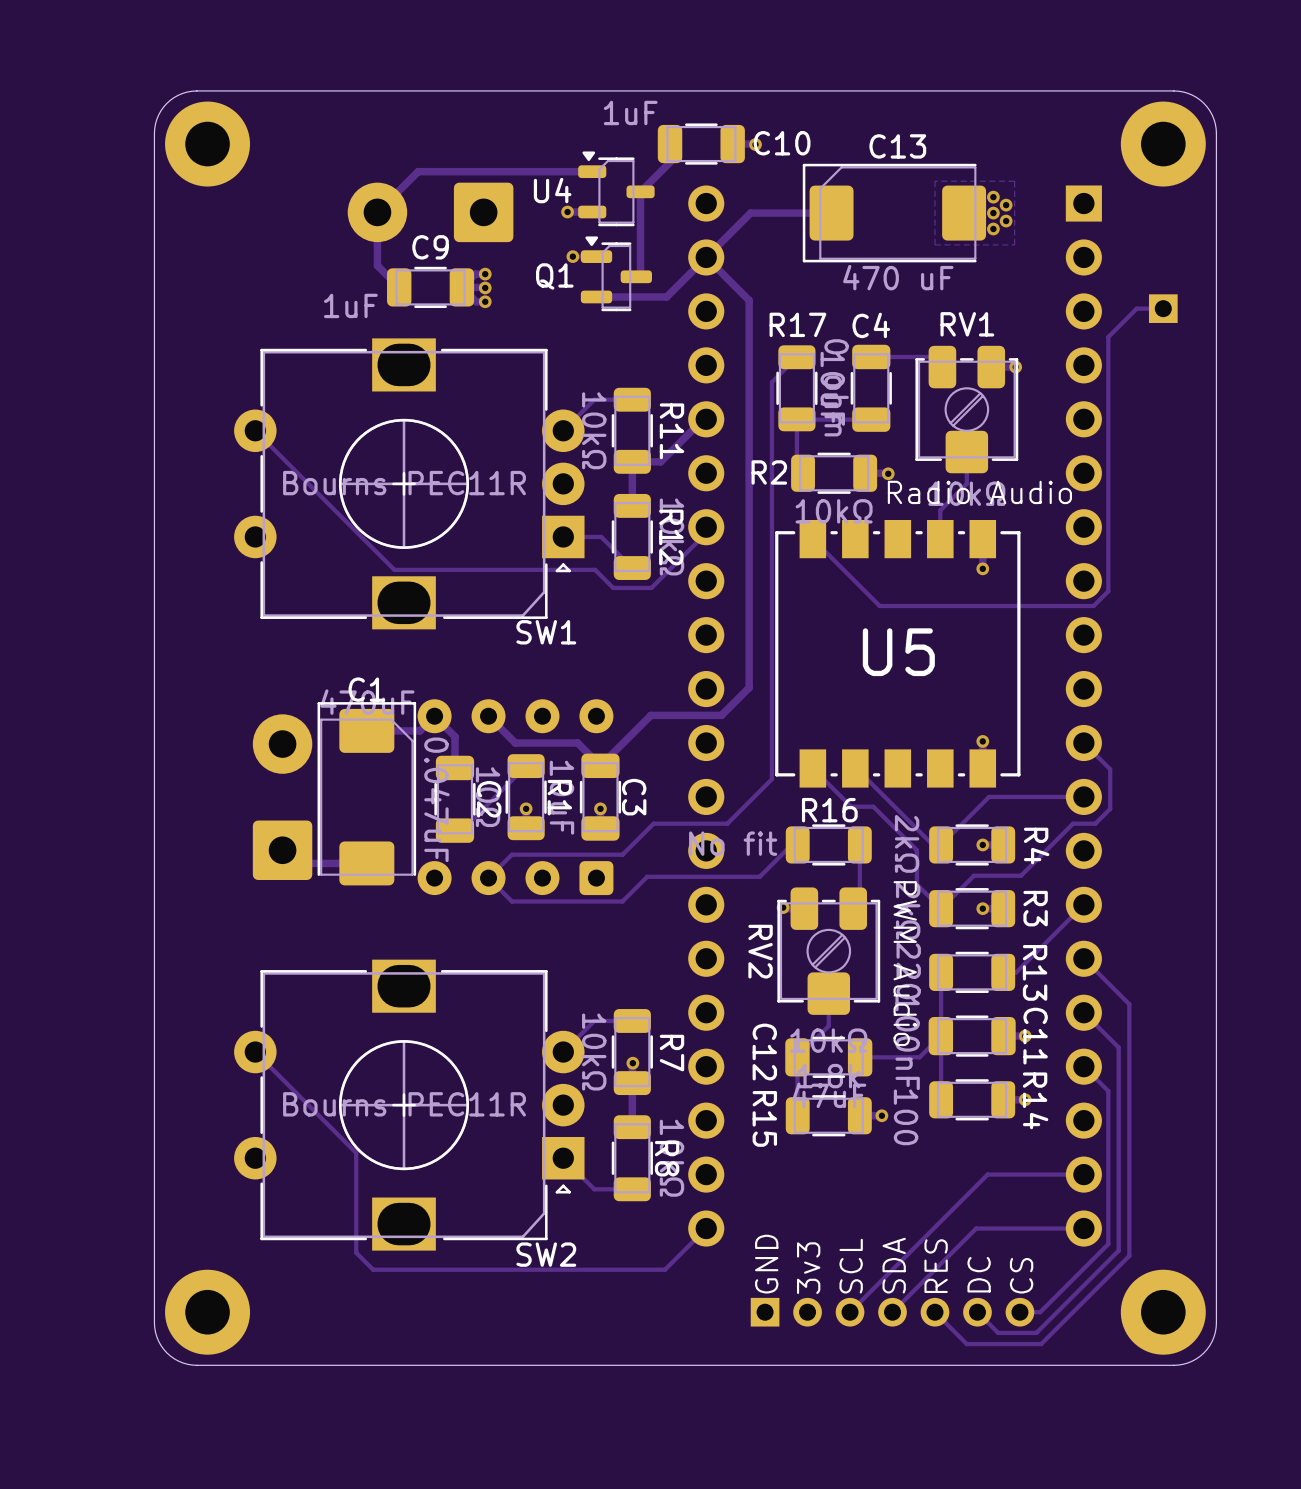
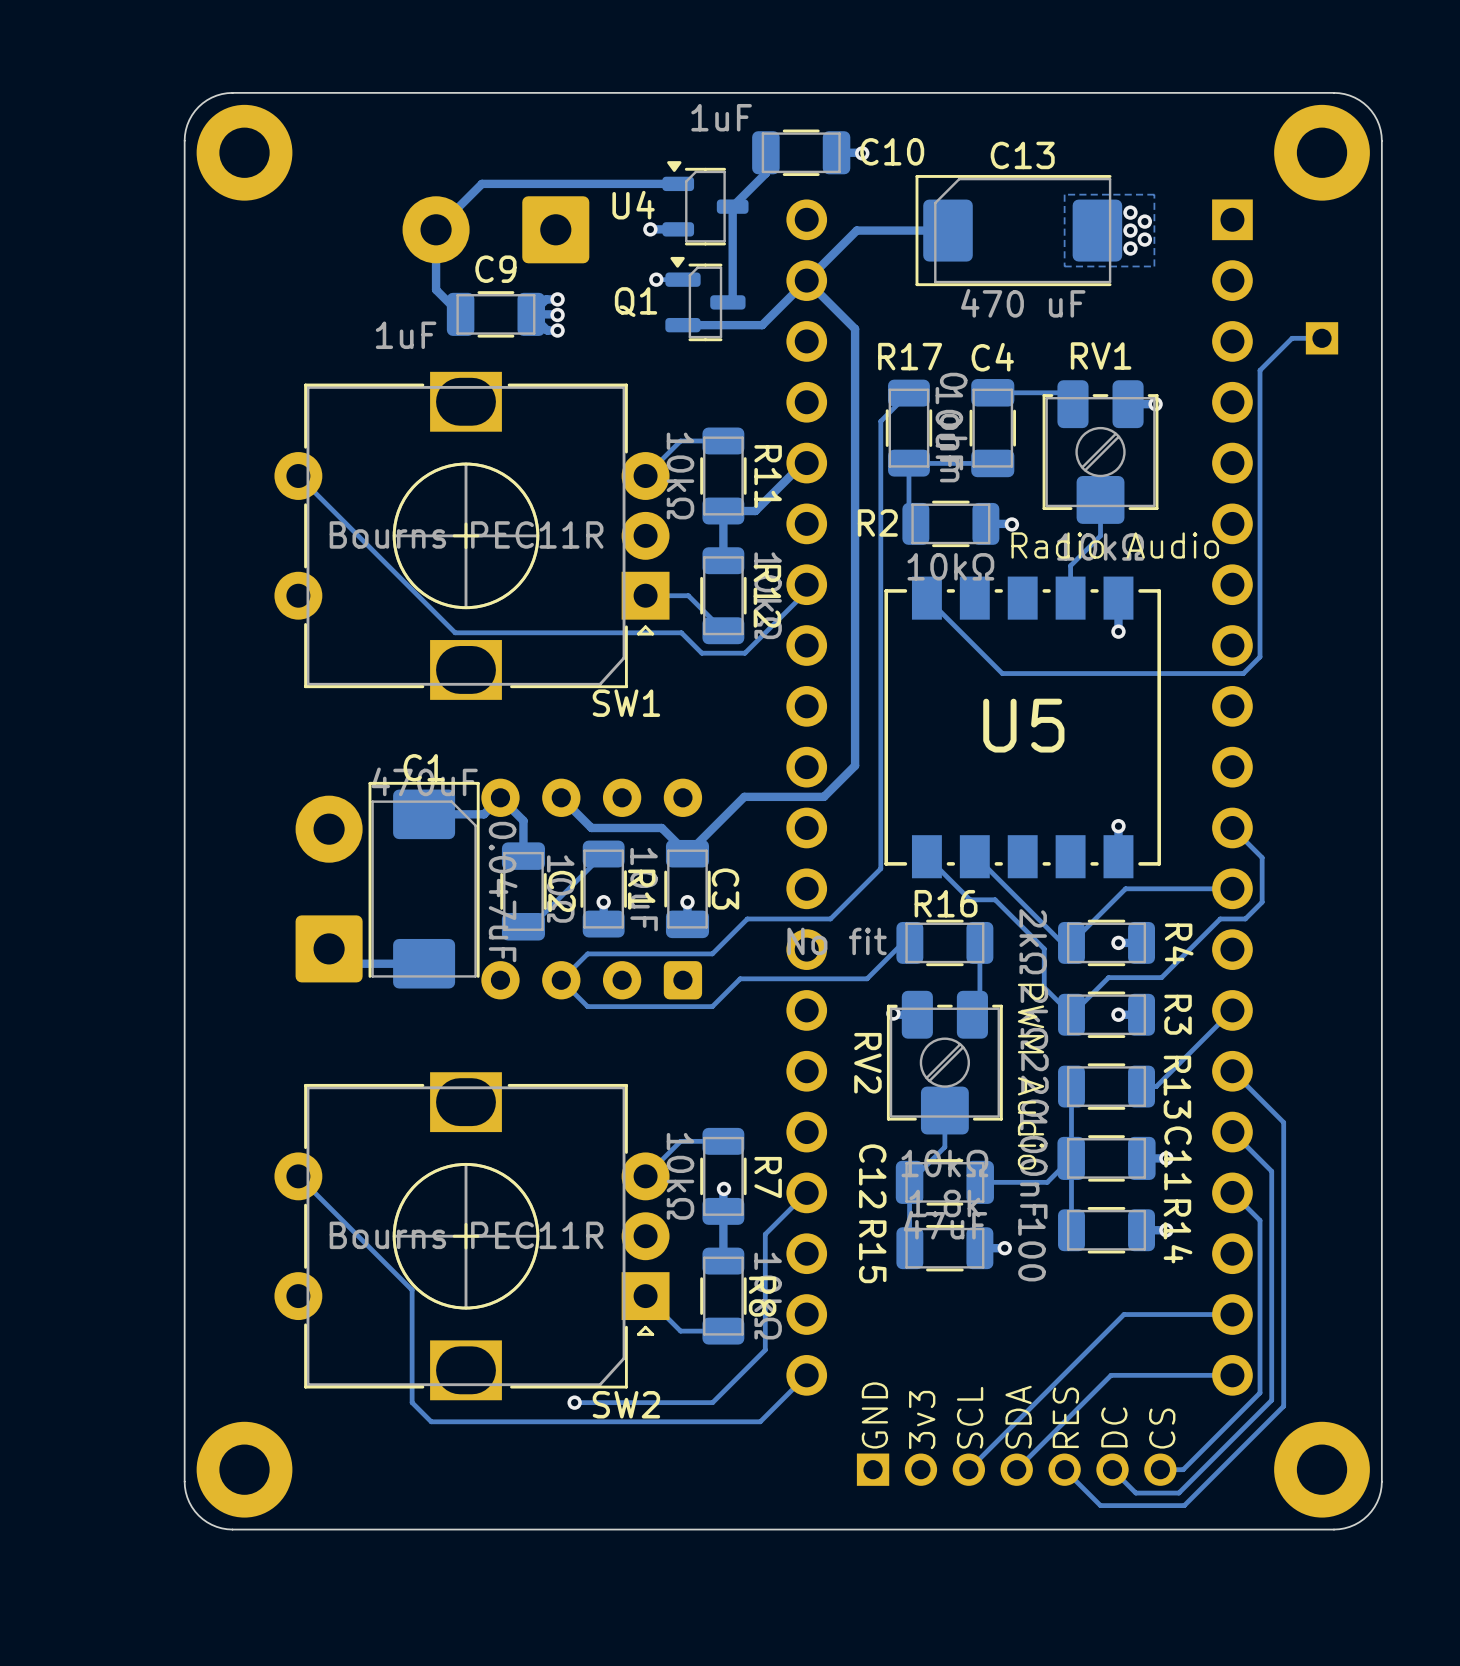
track: none -> (806, 1192) (765, 1234) (765, 1349) (712, 1402) (574, 1402)
via: none -> (574, 1402)

